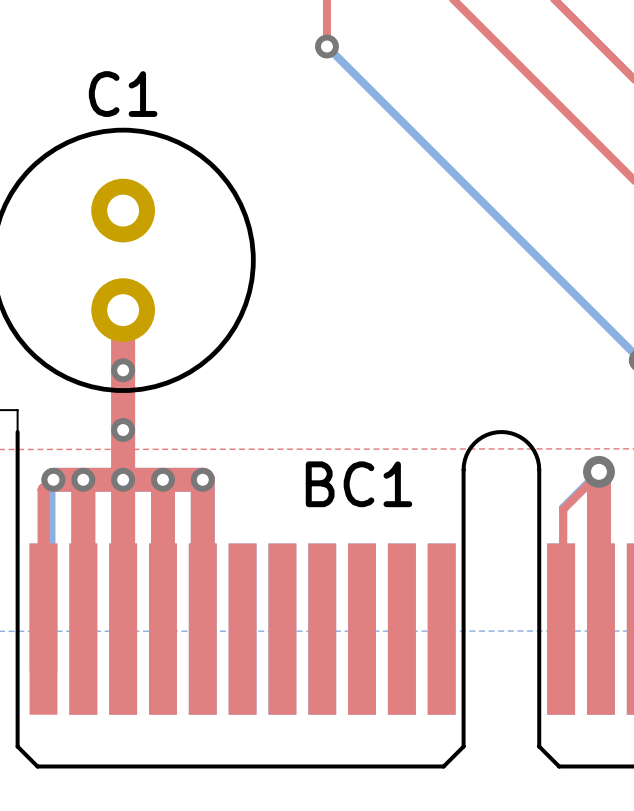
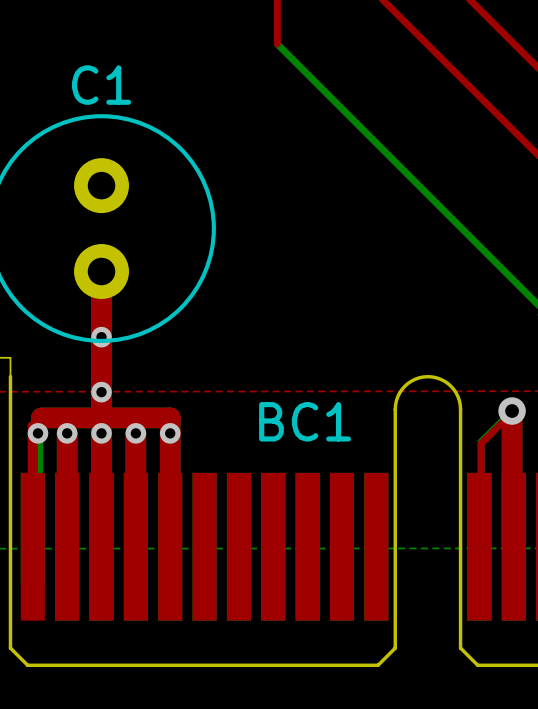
via: (326, 46) -> none
via position: (123, 370) -> (101, 337)
via position: (123, 430) -> (101, 392)
via position: (53, 479) -> (37, 433)
via position: (83, 479) -> (67, 433)
via position: (123, 479) -> (101, 433)
via position: (162, 479) -> (135, 433)
via position: (202, 479) -> (170, 433)

